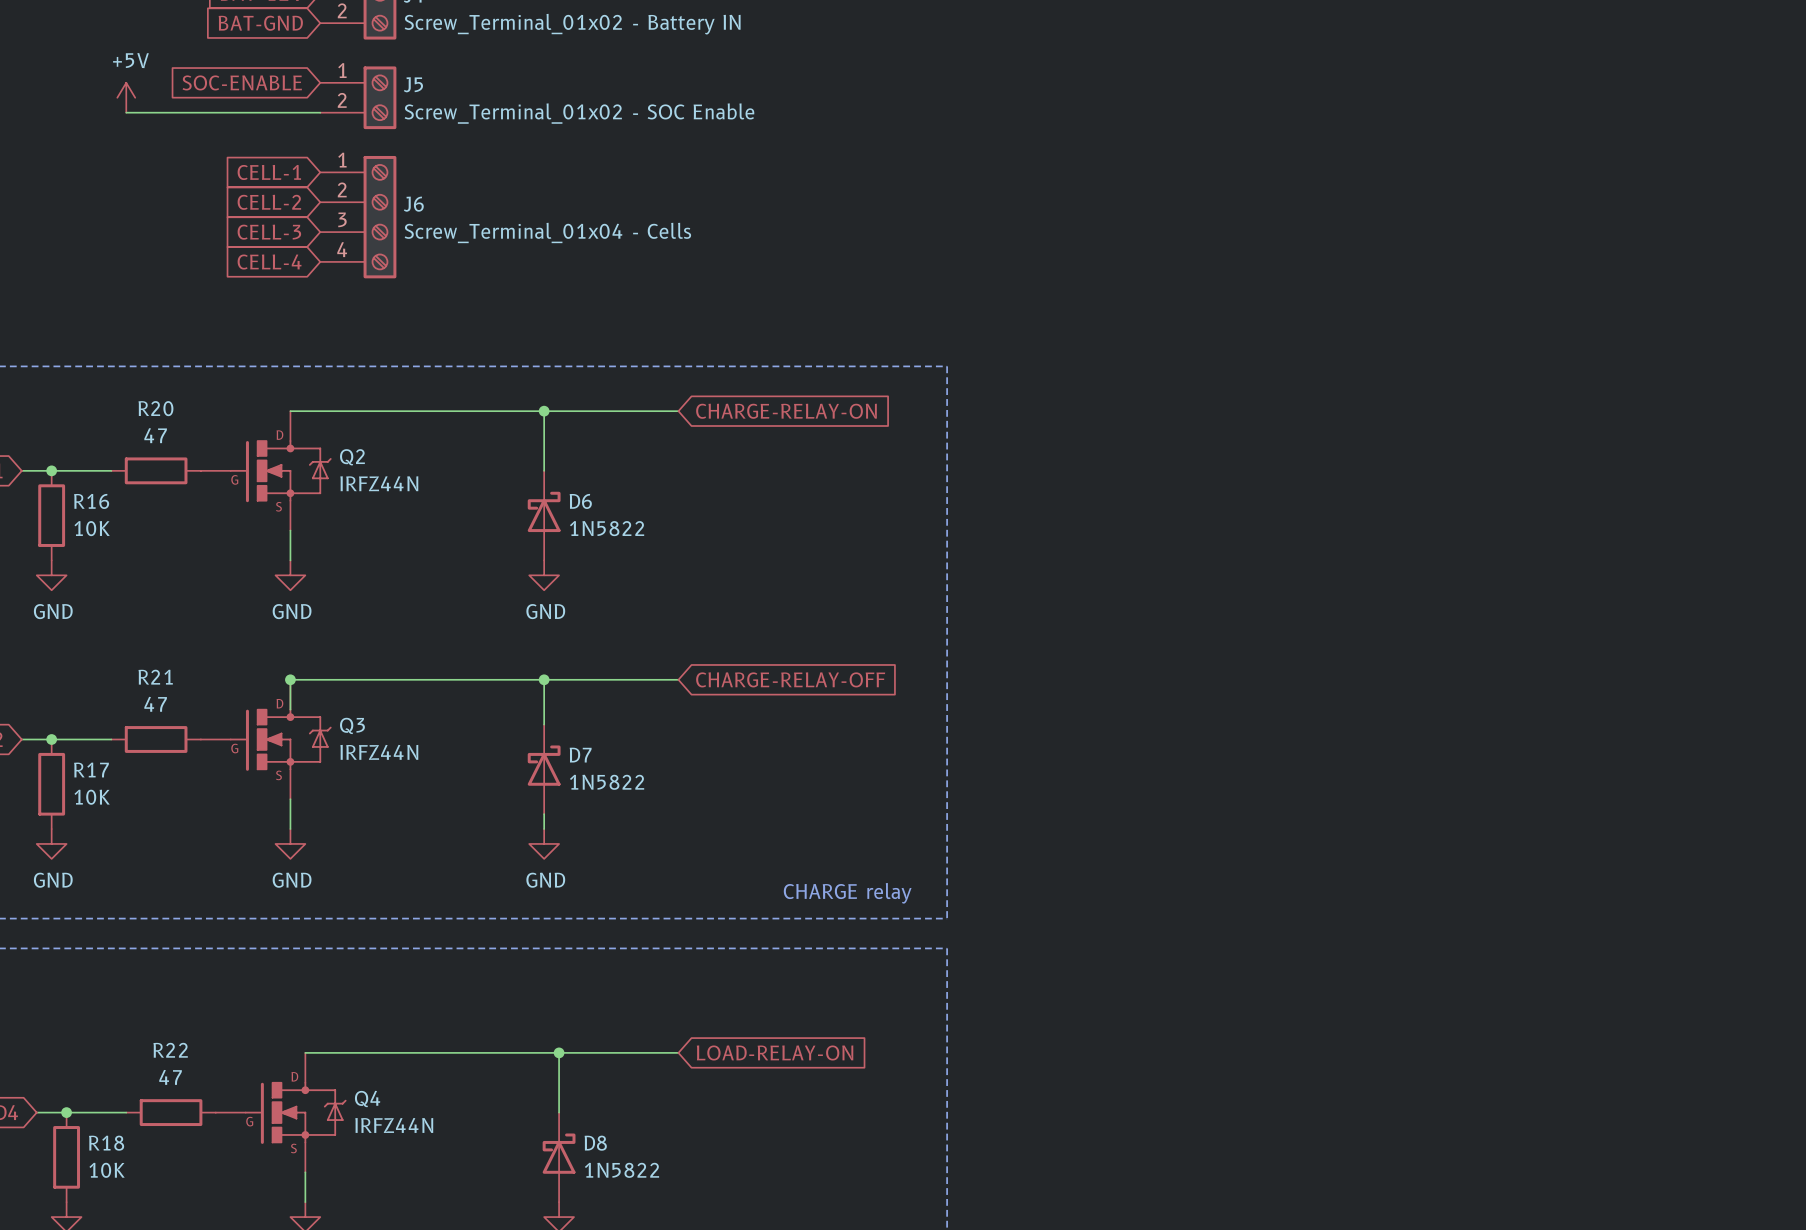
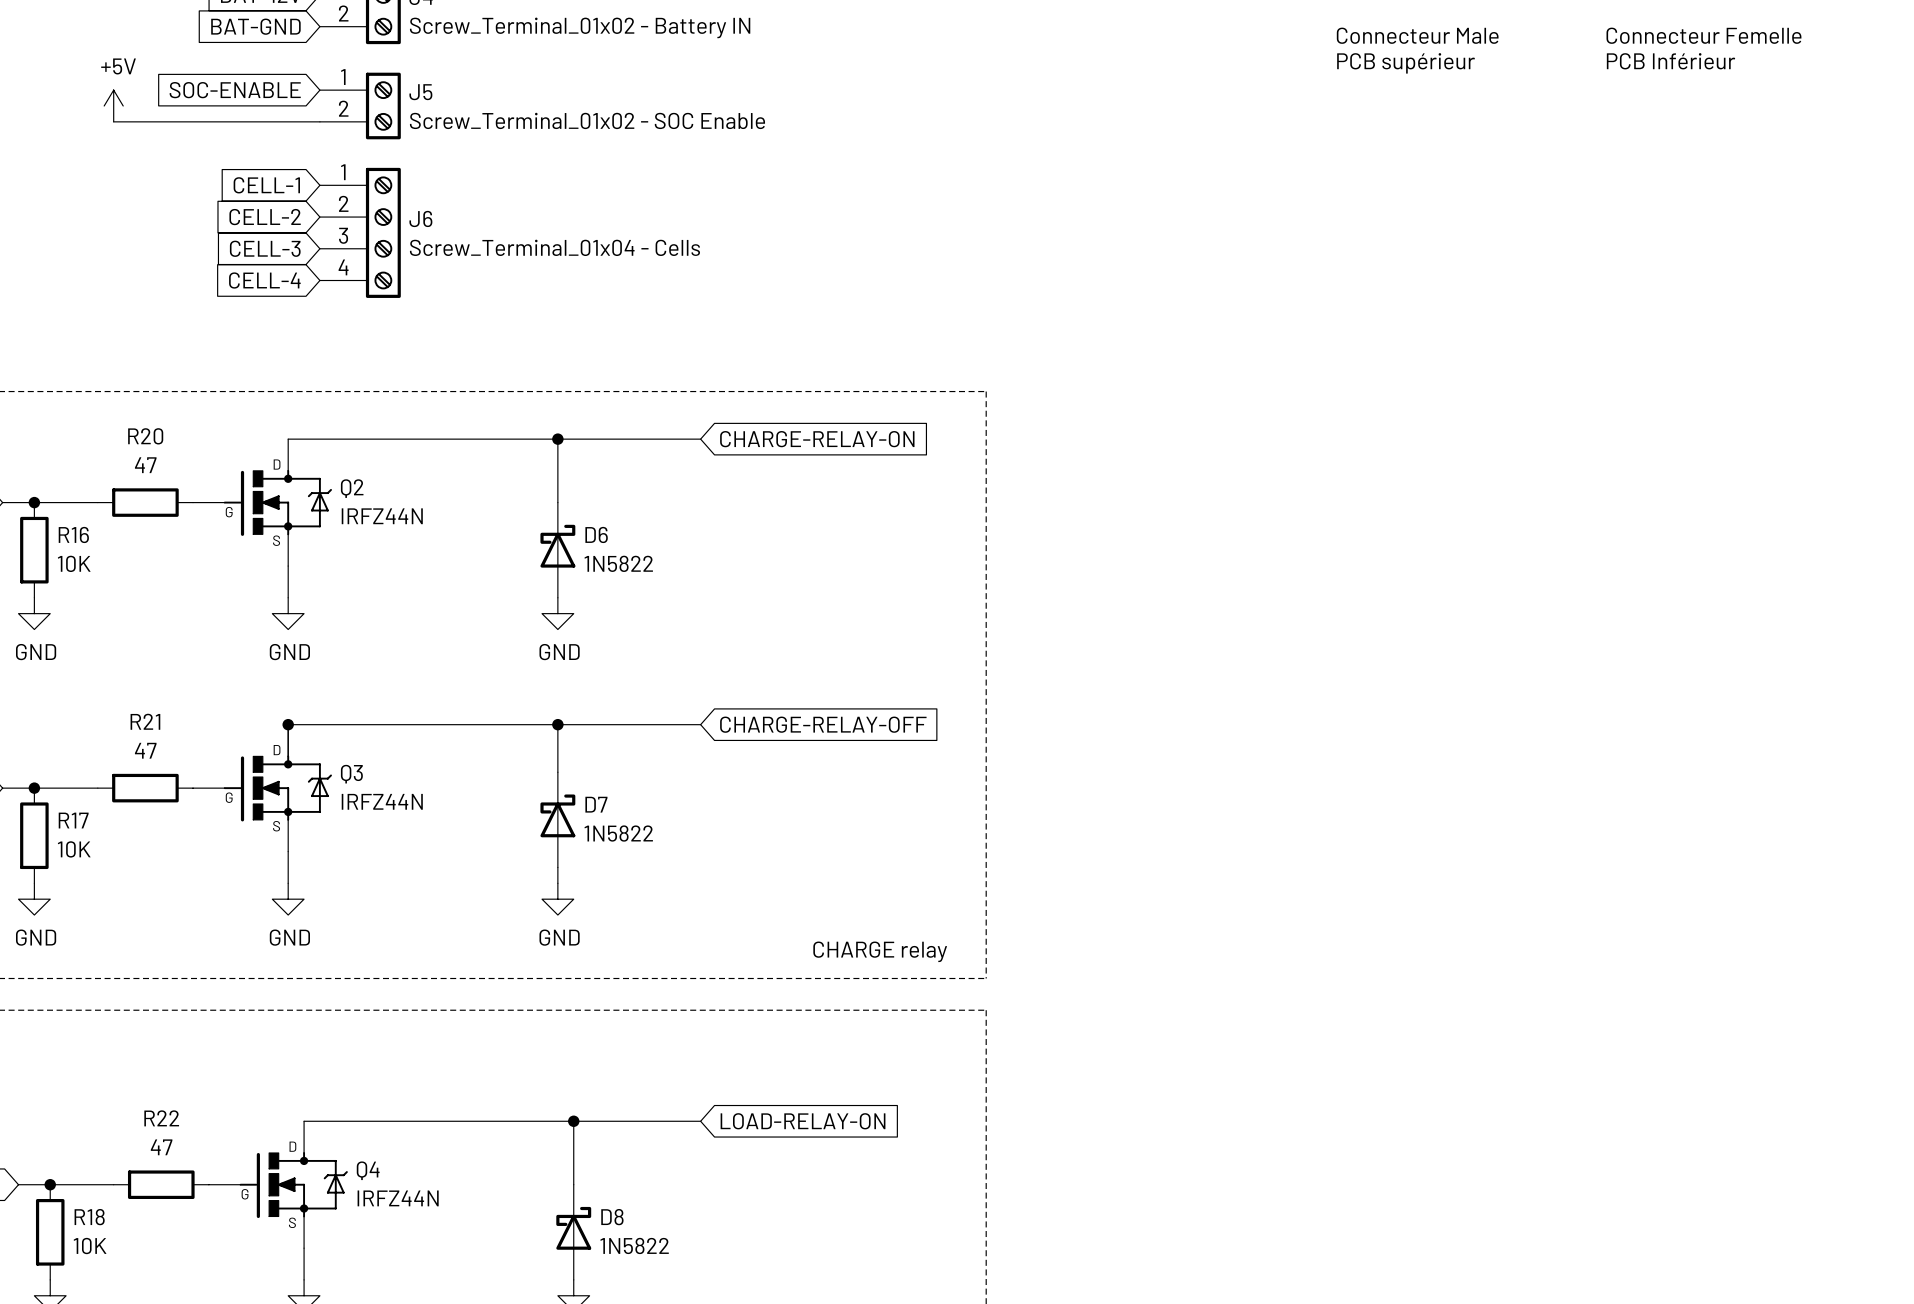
text: none -> Connecteur Male (1417, 35)
text: none -> Connecteur Femelle (1703, 35)
text: none -> PCB Inférieur (1671, 61)
text: none -> PCB supérieur (1406, 63)

